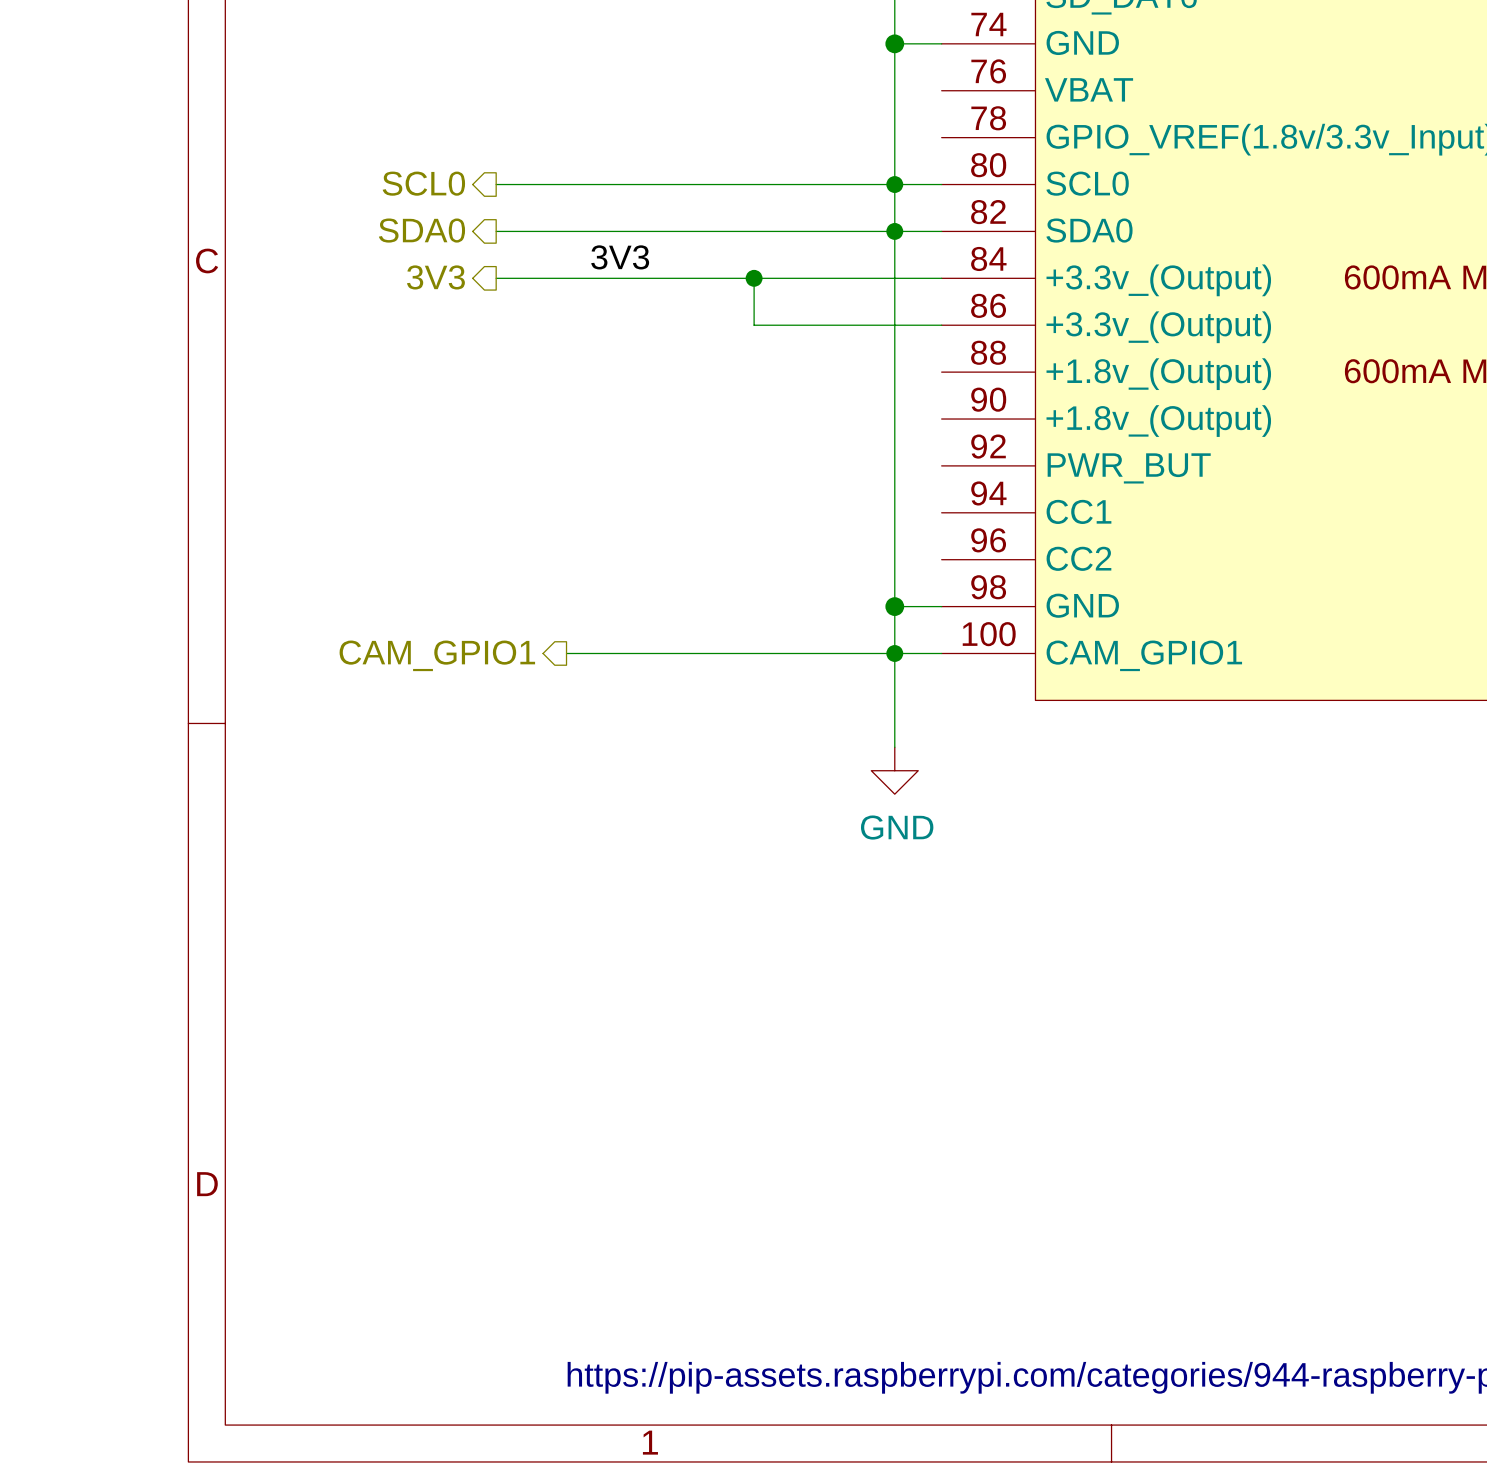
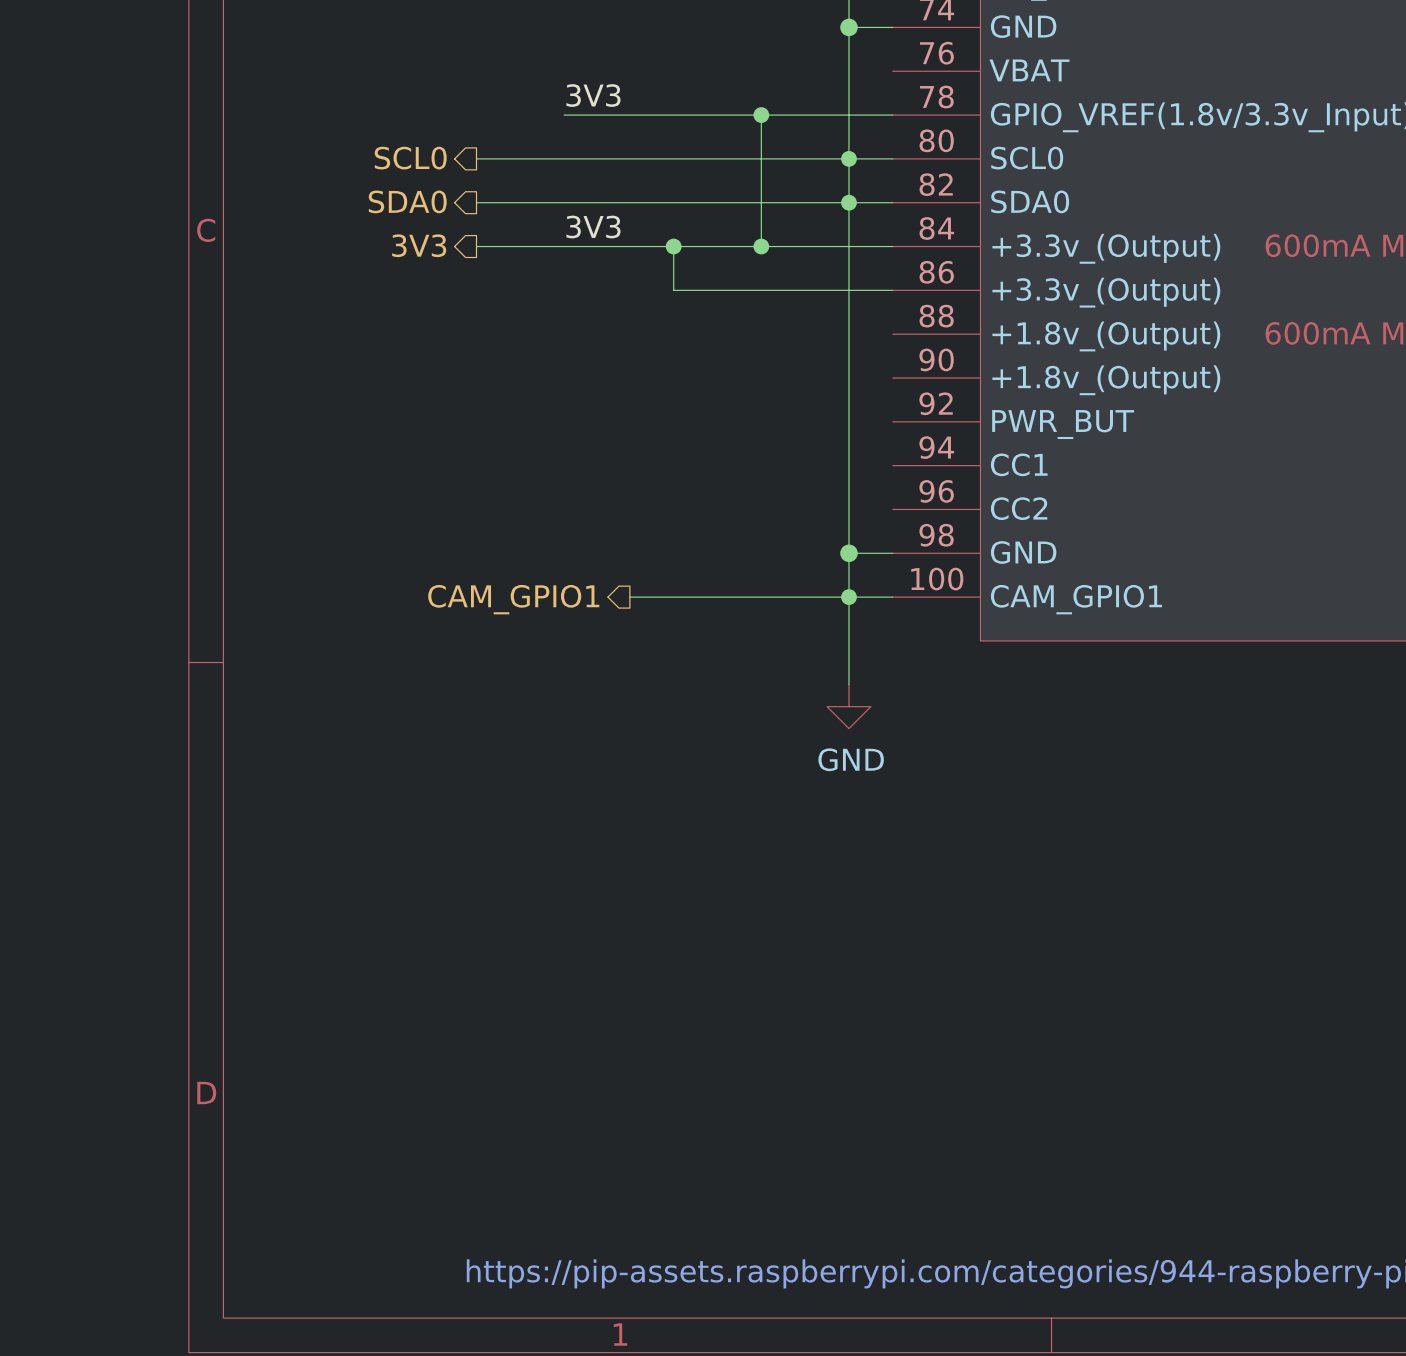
label: none -> 3V3 (593, 95)
wire: none -> (564, 115) (892, 115)
wire: none -> (761, 115) (761, 246)
junction: none -> (761, 115)
junction: none -> (673, 246)
wire: (754, 278) (754, 325) -> (673, 246) (673, 290) (717, 290)
junction: (754, 278) -> none
junction: none -> (761, 246)
wire: (566, 653) (660, 653) -> none
hierarchical label position: CAM_GPIO1 (437, 655) -> CAM_GPIO1 (513, 599)

